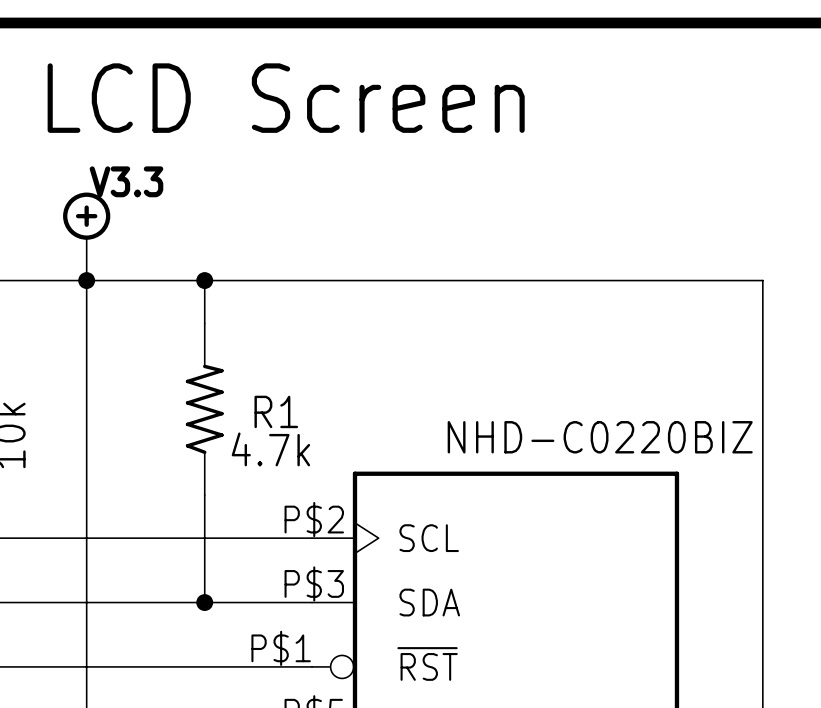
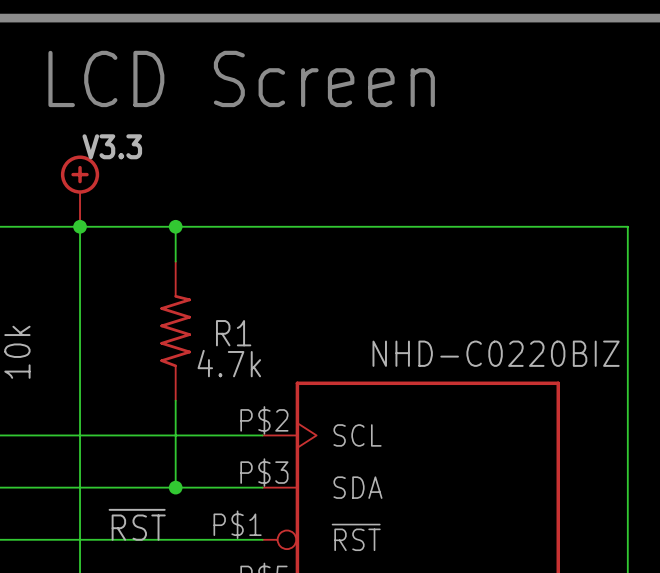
label: none -> ~{RST} (137, 524)

